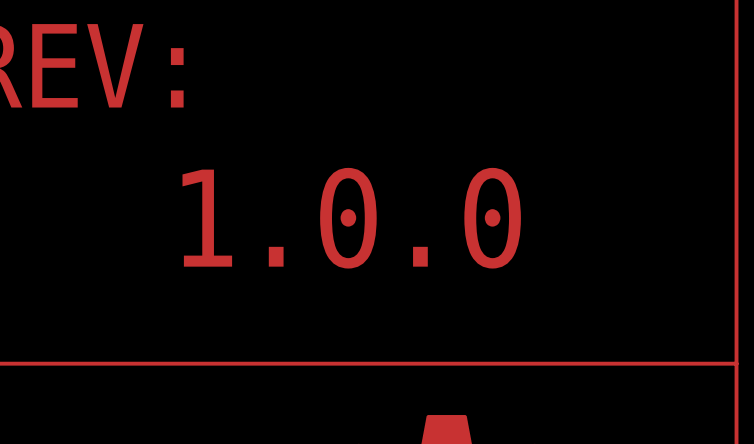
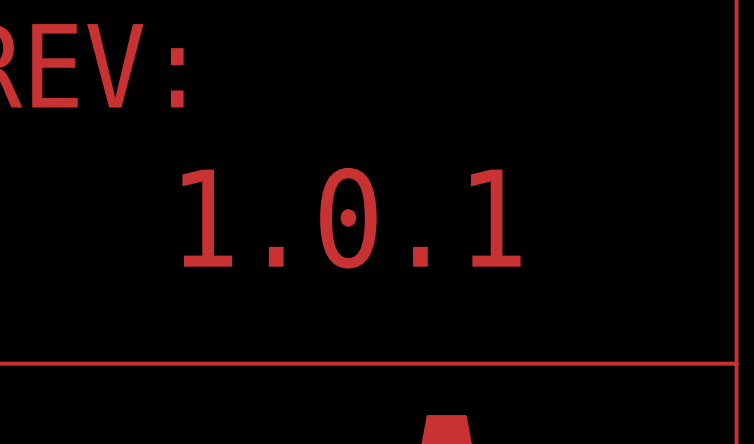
text: 1.0.0 (351, 218) -> 1.0.1 (351, 218)

